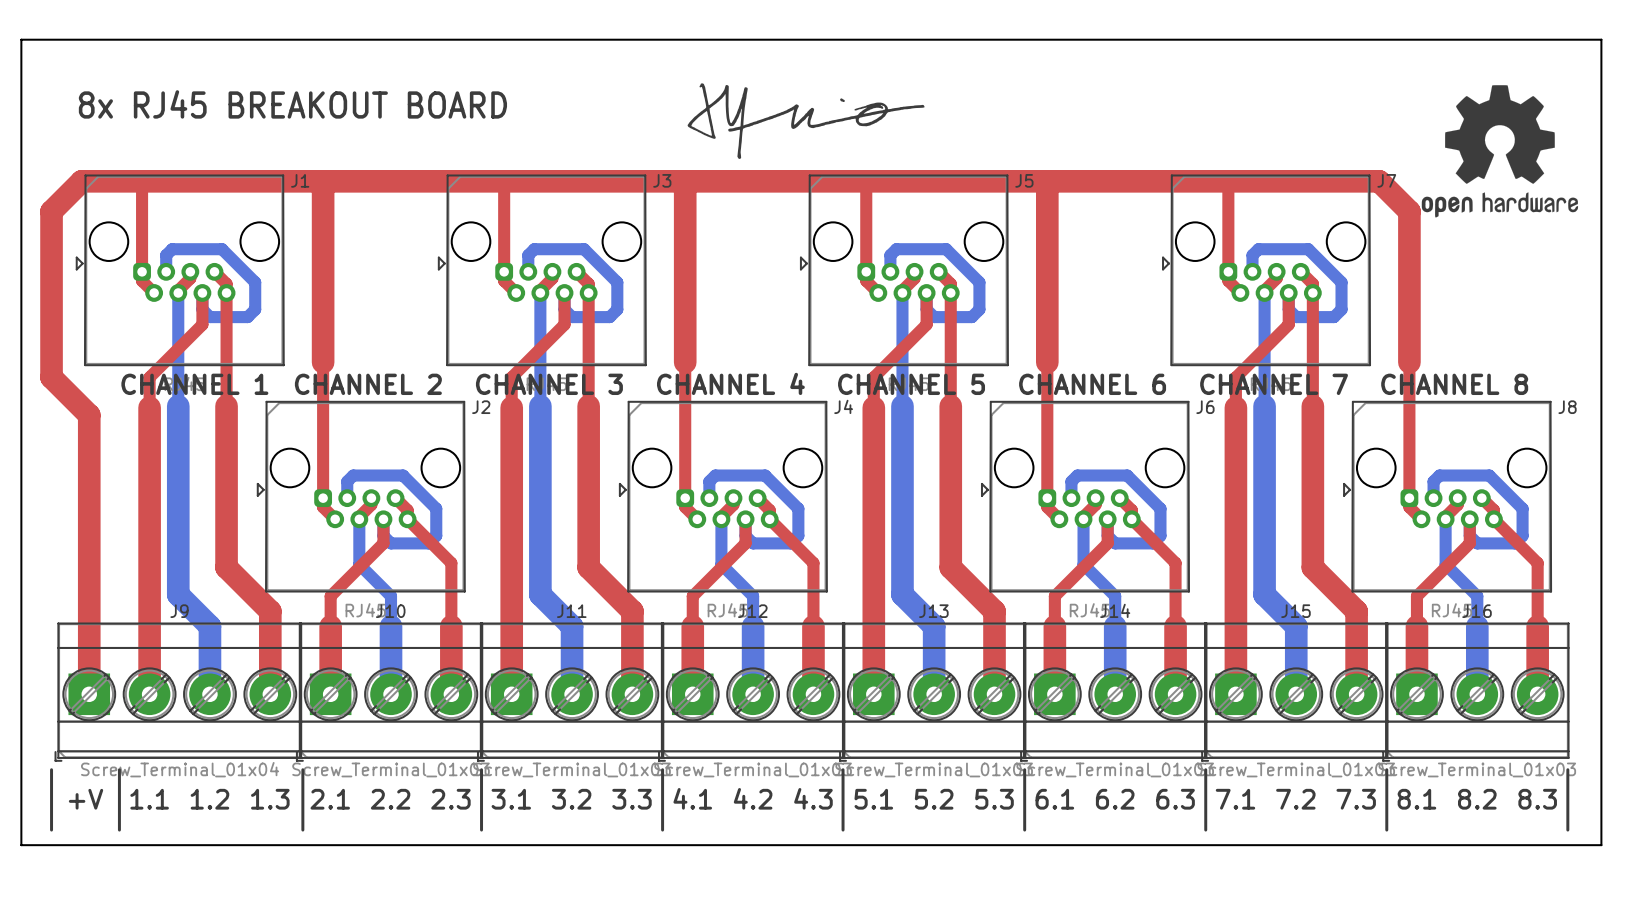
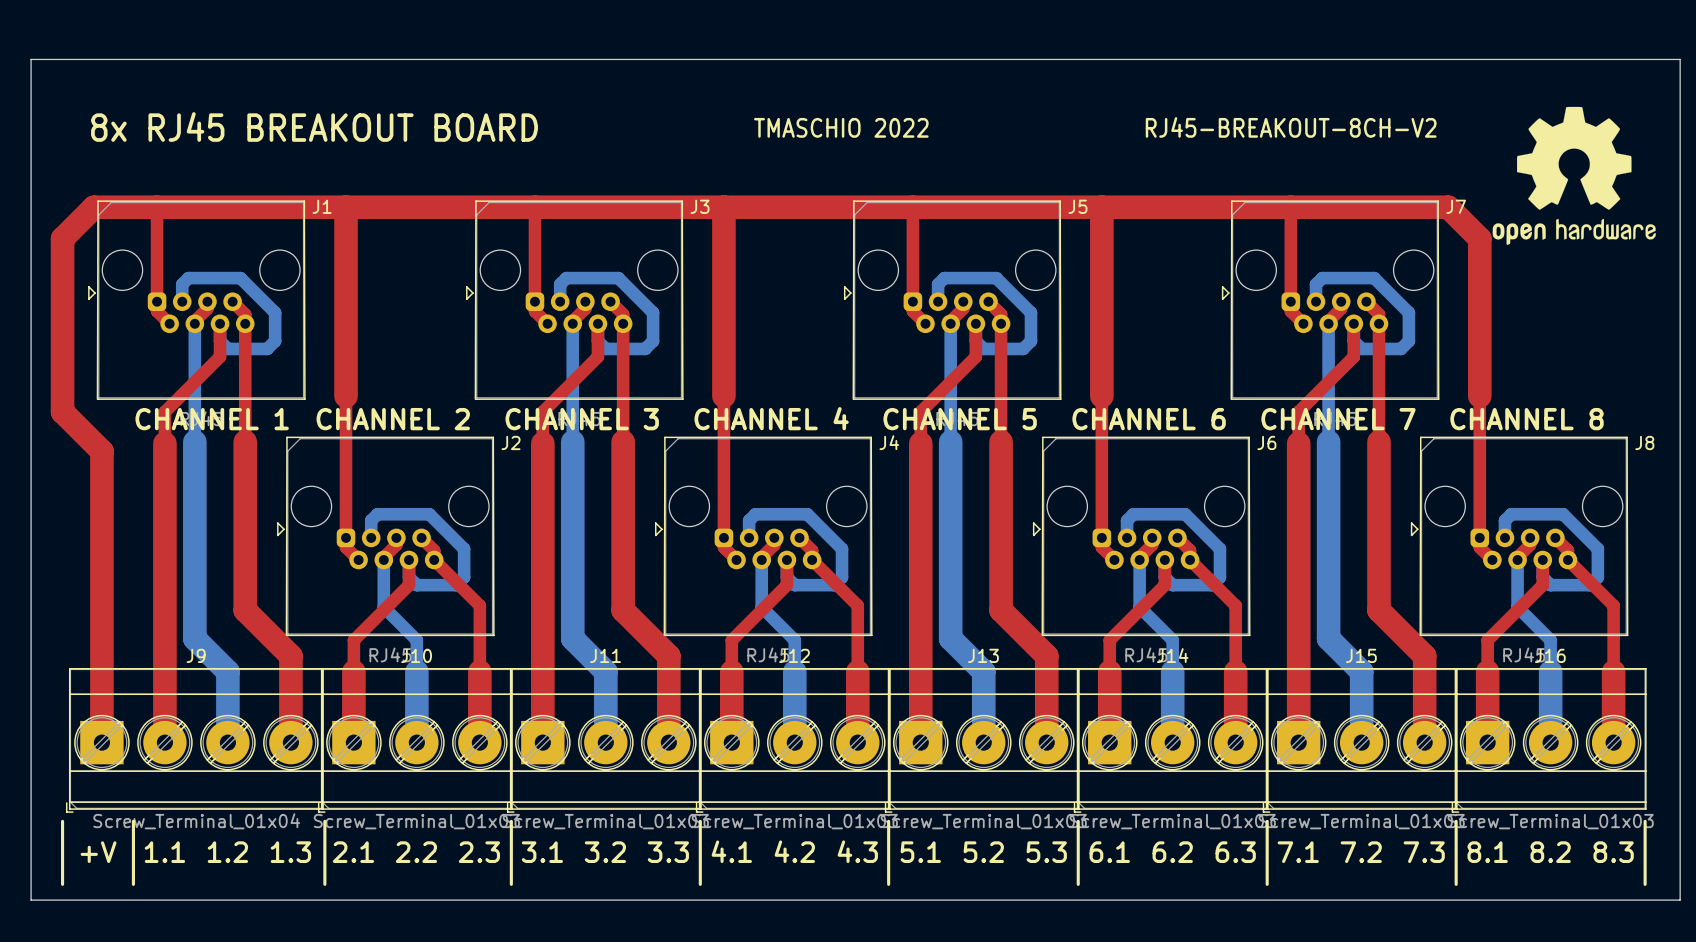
drawing: [687, 83, 925, 159] -> none
text: none -> RJ45-BREAKOUT-8CH-V2 (1291, 127)
text: none -> TMASCHIO 2022 (841, 127)

